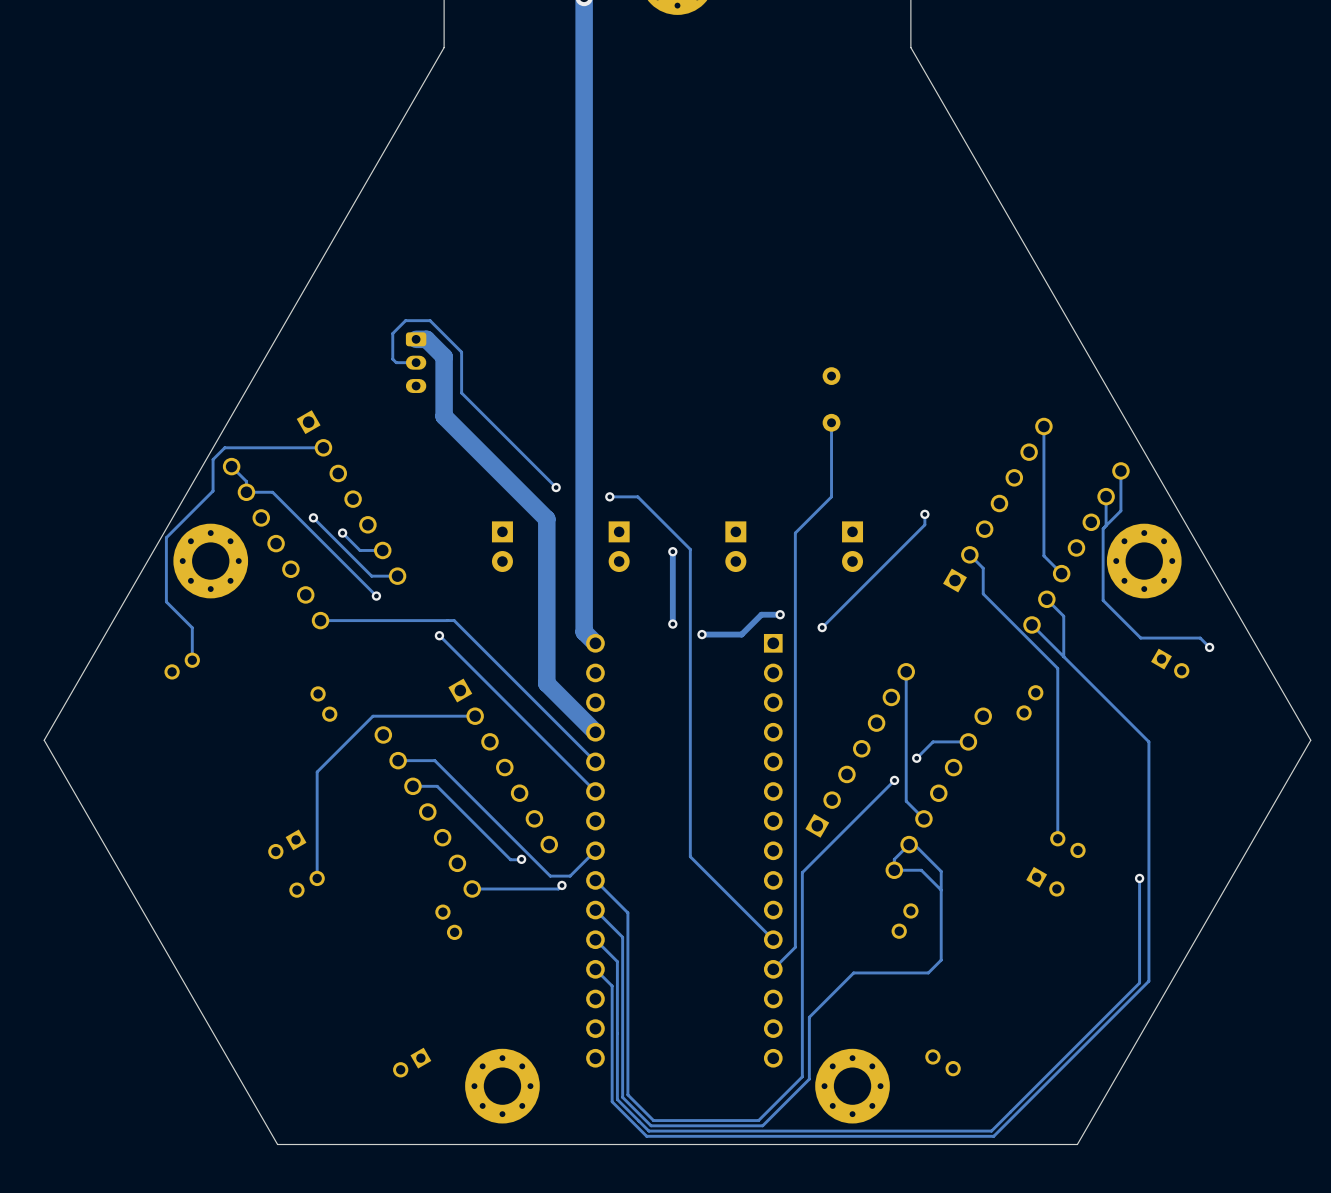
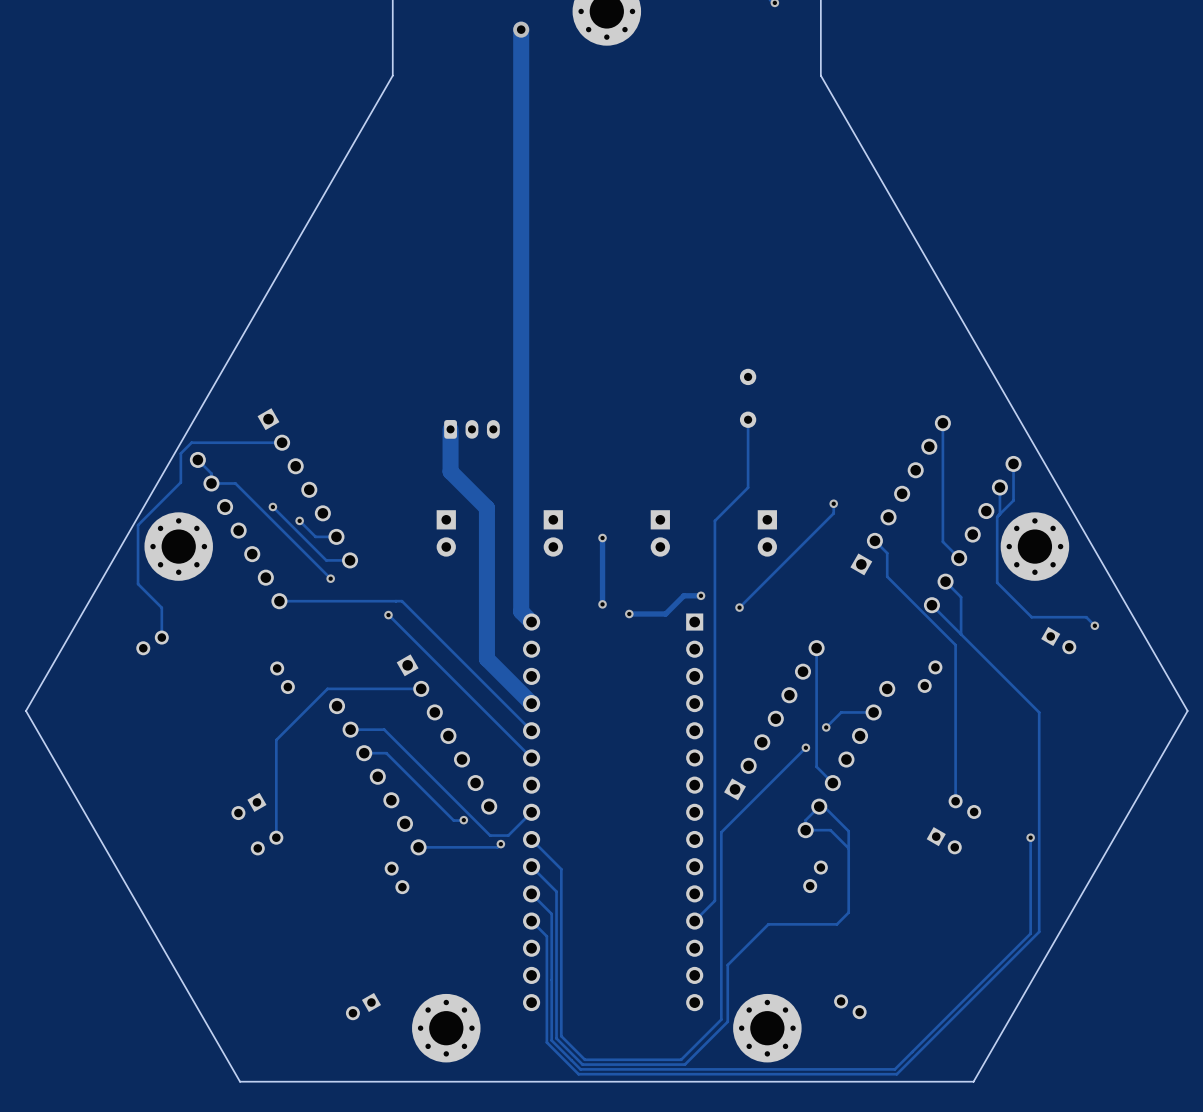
track: (416, 339) (426, 339) (444, 356) (444, 416) (507, 479) -> (450, 429) (450, 471)
track: (416, 362) (396, 362) (392, 359) (392, 333) (405, 320) (430, 320) (461, 352) (461, 393) (556, 487) -> none
part rotation: 0° (416, 362) -> 90° counterclockwise (471, 429)
part position: (416, 362) -> (471, 429)
via: (556, 487) -> none
track: (609, 496) (637, 496) (690, 549) (690, 856) (773, 939) -> none
via: (609, 496) -> none

